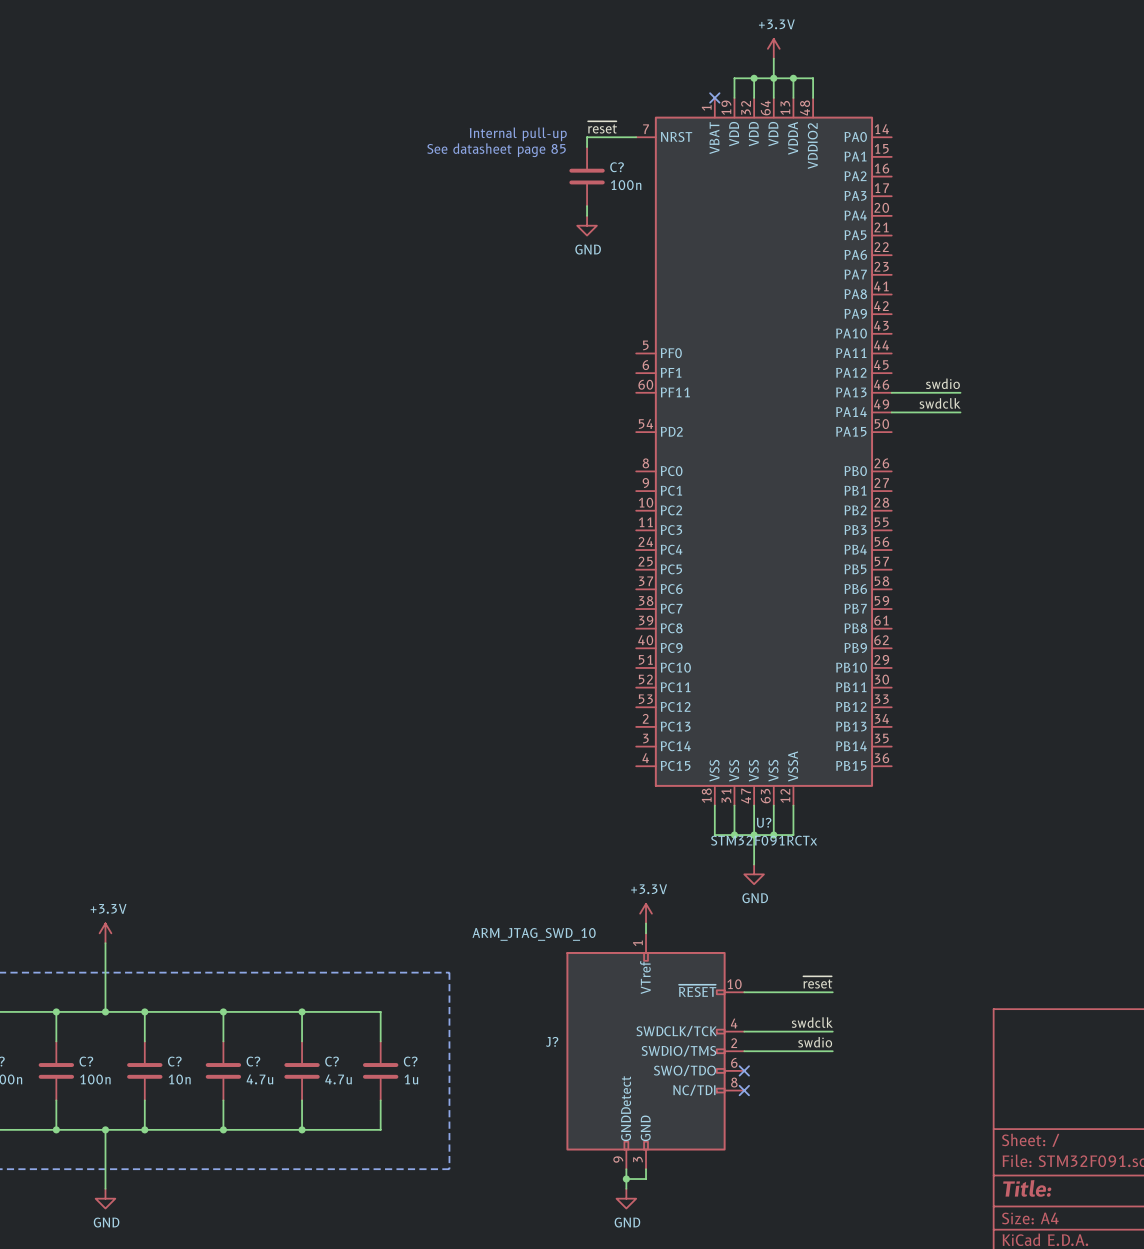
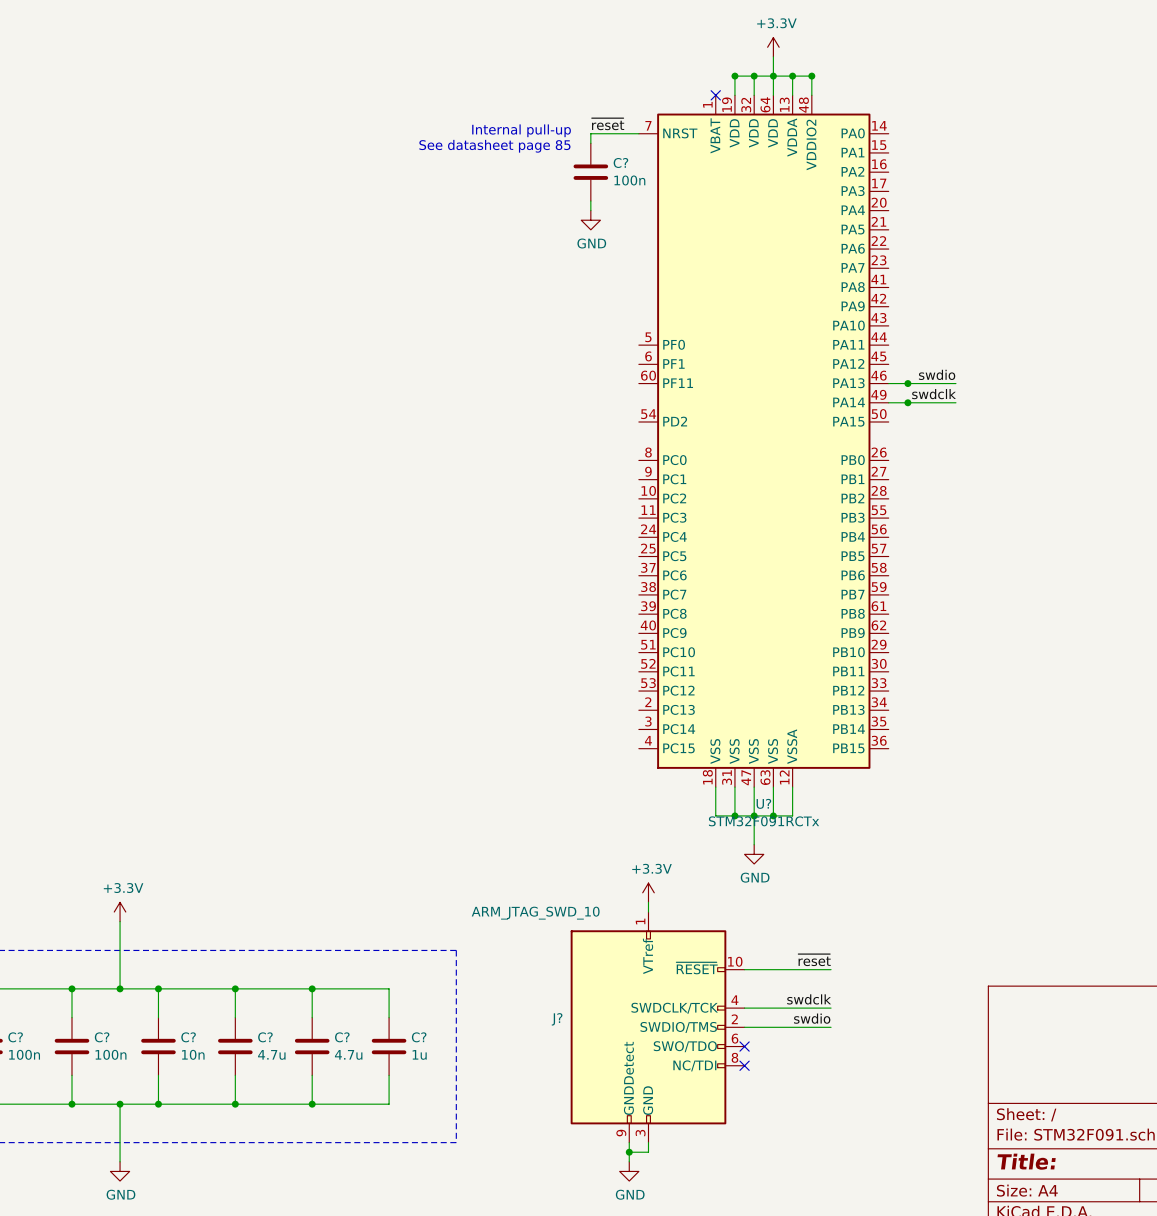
junction: none -> (734, 76)
junction: none -> (811, 76)
junction: none -> (907, 383)
junction: none -> (907, 402)

